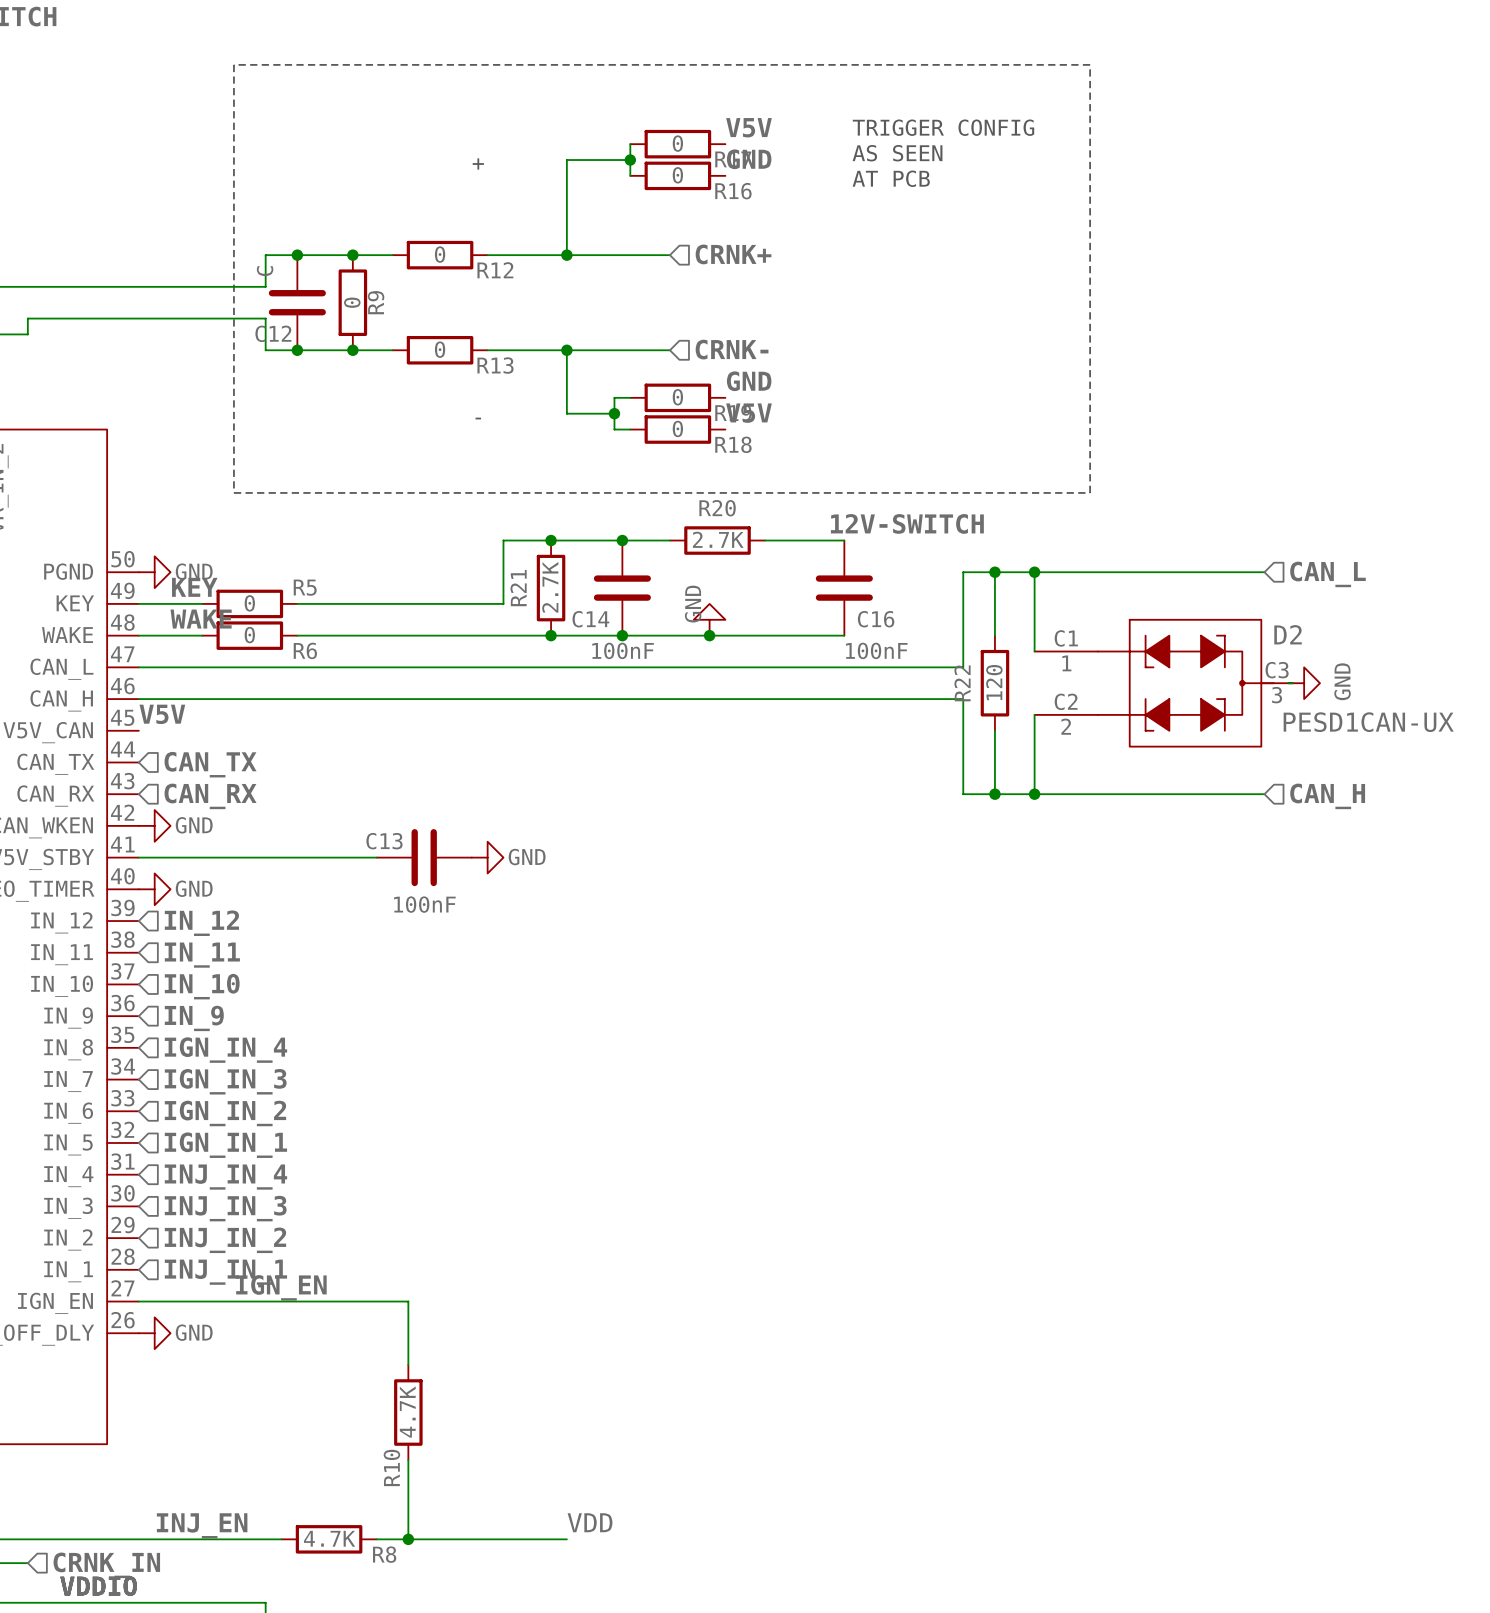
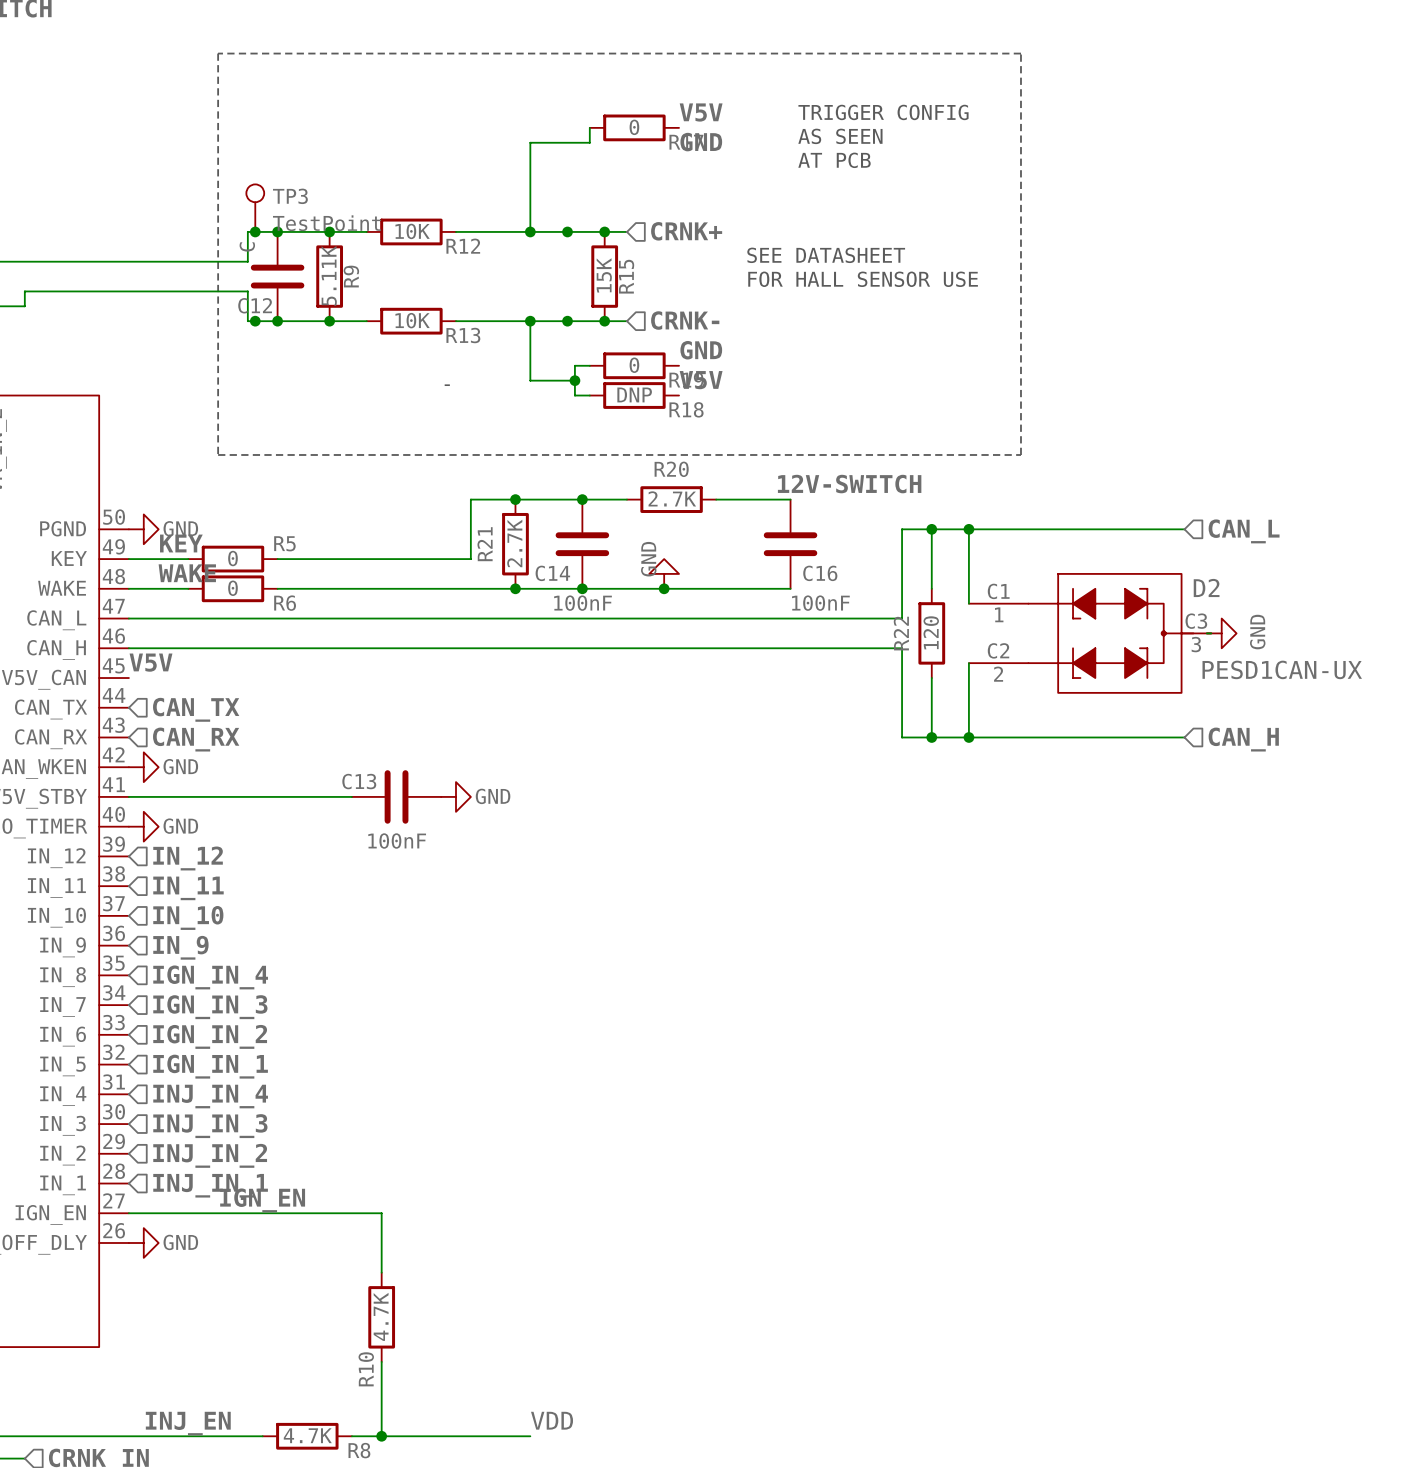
wire: (630, 160) (630, 175) -> none
junction: (630, 160) -> none
text: + (478, 163) -> none
R16: 0 (677, 175) -> none
TP3: none -> TestPoint (255, 208)
R12 value: 0 (440, 254) -> 10K (412, 231)
junction: none -> (255, 231)
junction: none -> (567, 231)
junction: none -> (604, 231)
text: none -> SEE DATASHEET (826, 255)
R9 value: 0 (352, 302) -> 5.11K (329, 275)
R15: none -> 15K (604, 276)
text: none -> FOR HALL SENSOR USE (863, 279)
R13 value: 0 (440, 349) -> 10K (412, 320)
junction: none -> (255, 321)
junction: none -> (567, 321)
junction: none -> (604, 321)
R18 value: 0 (677, 428) -> DNP (634, 394)

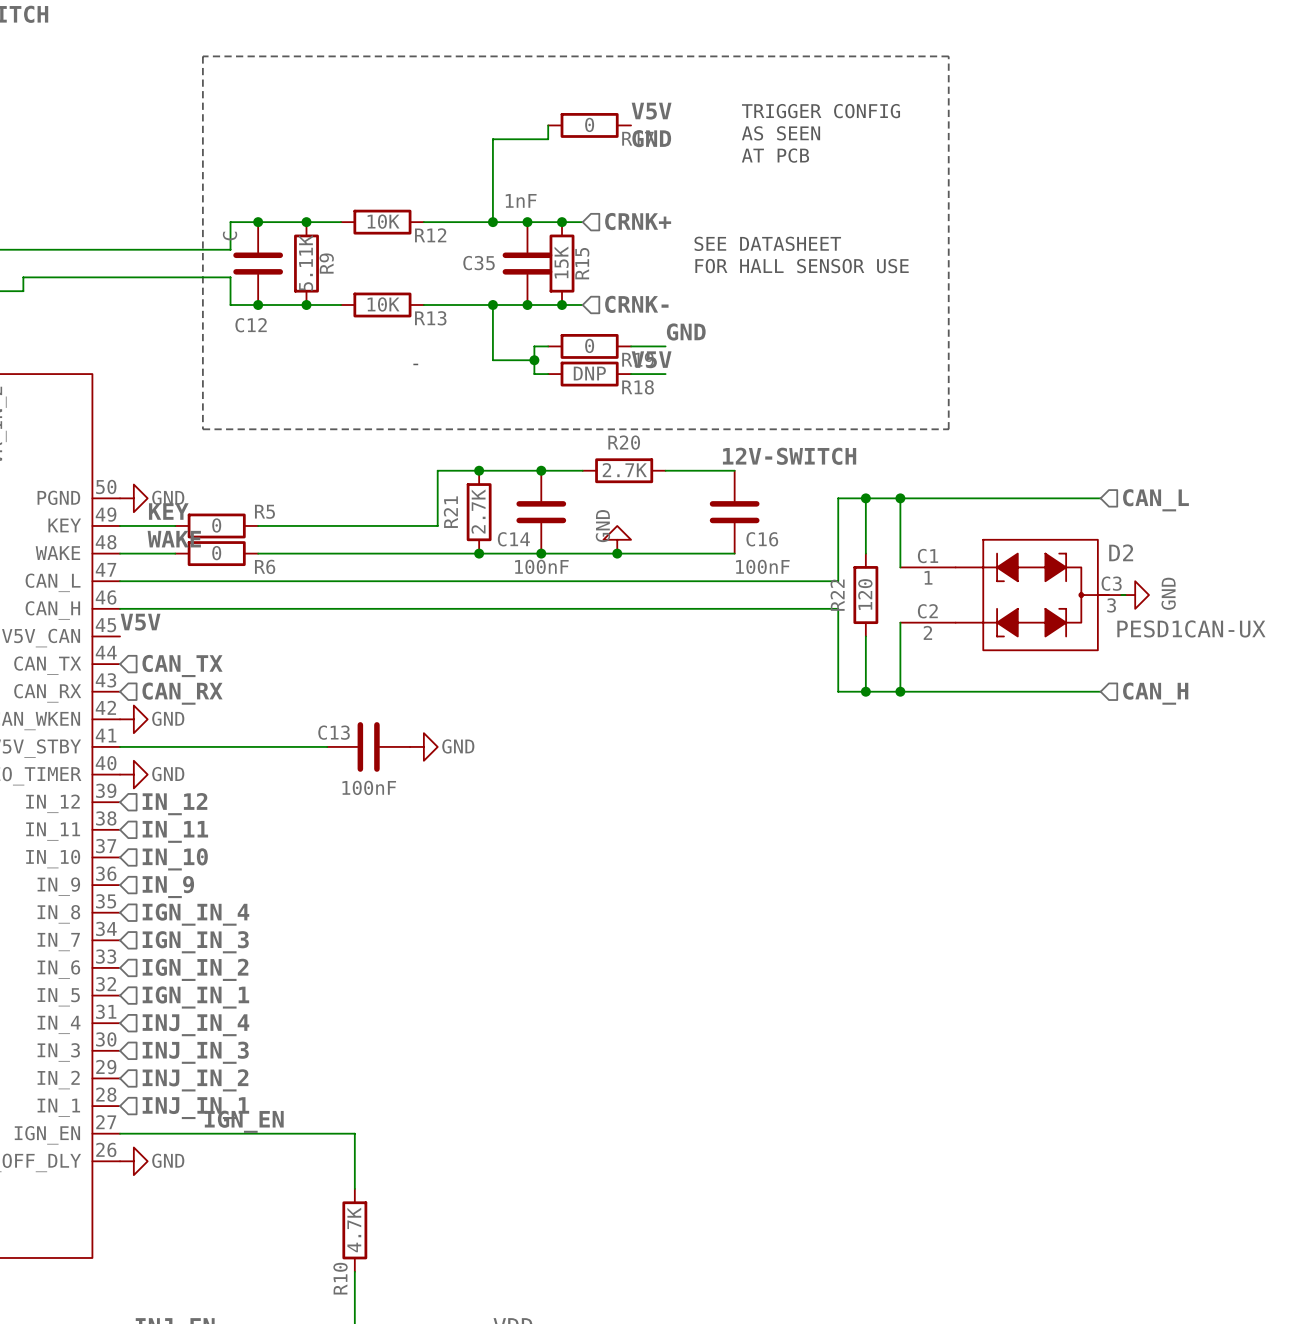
TP3: TestPoint (255, 208) -> none
junction: (255, 231) -> none
C35: none -> 1nF (527, 263)
C12 name position: C12 (255, 305) -> C12 (251, 325)
junction: (255, 321) -> none
label position: GND (701, 350) -> GND (686, 331)
wire: none -> (631, 346) (665, 346)
wire: none -> (631, 374) (665, 374)

